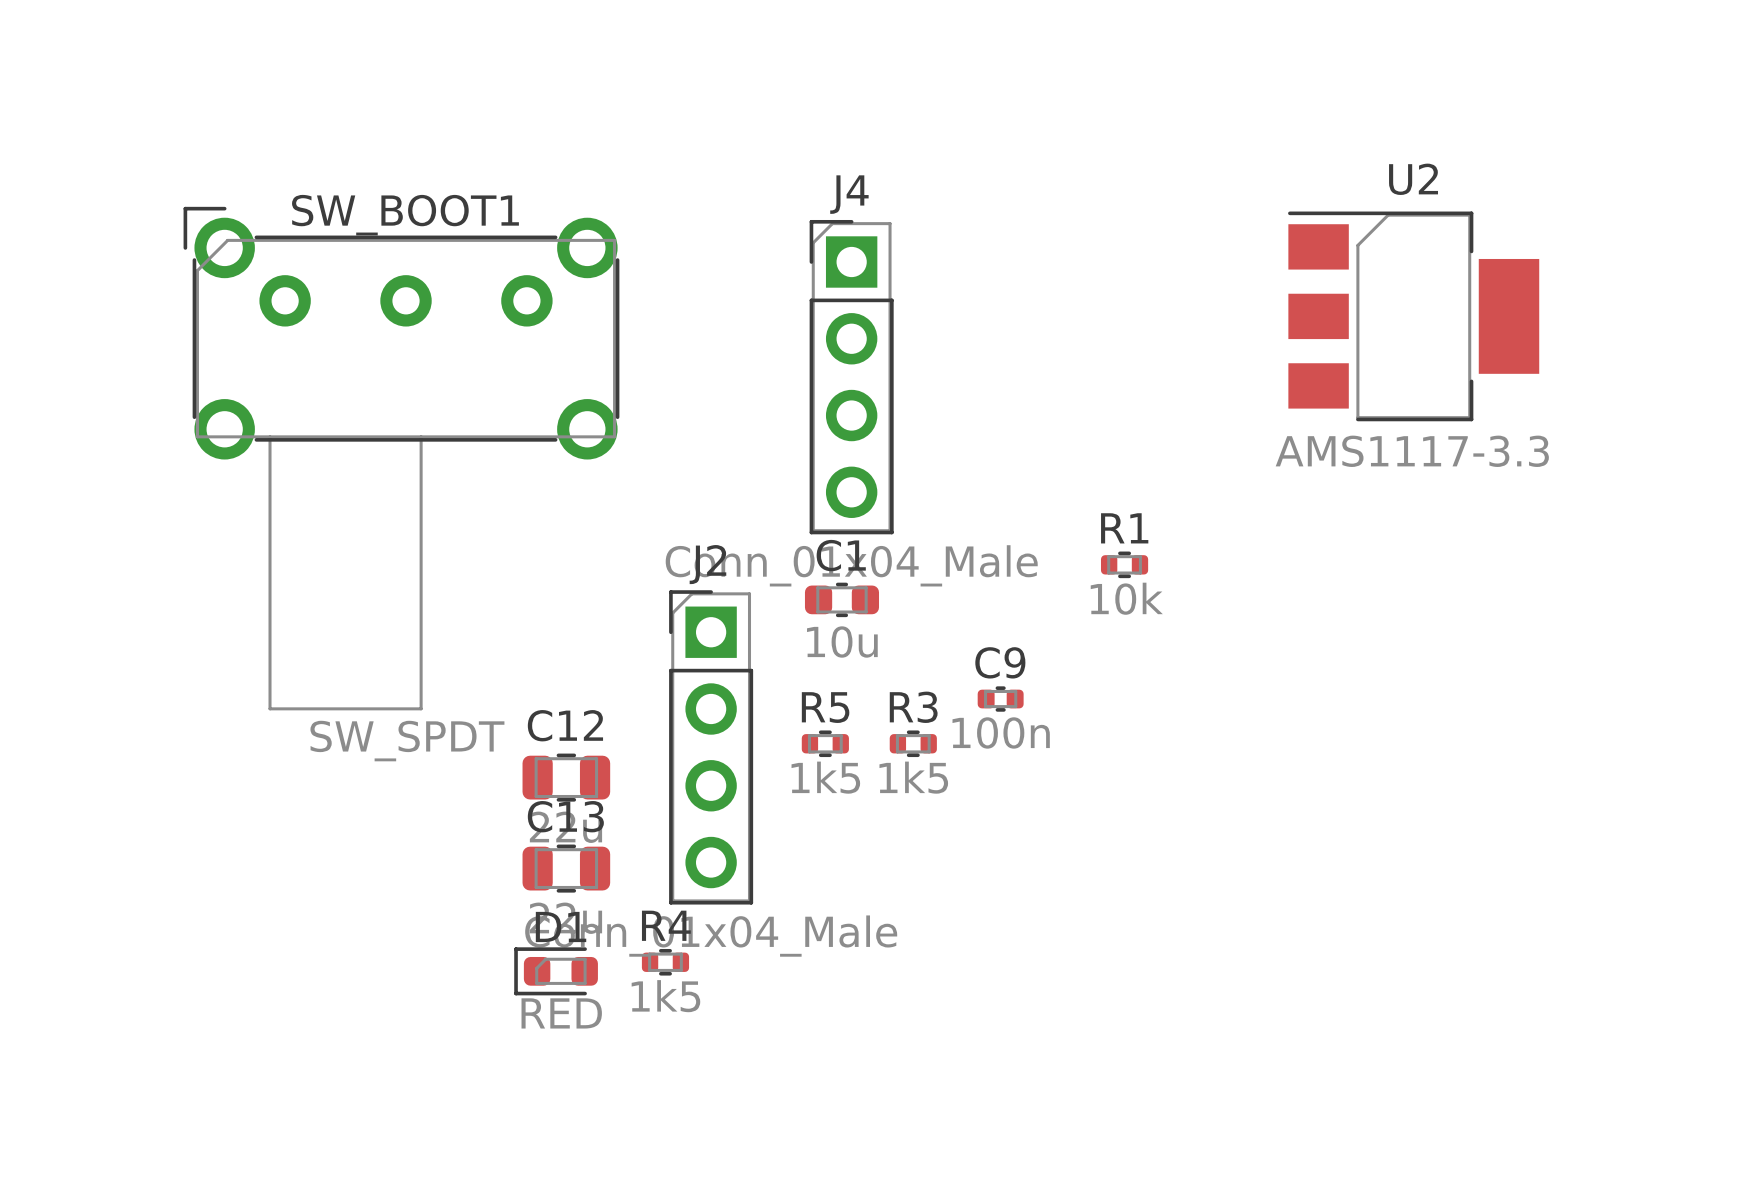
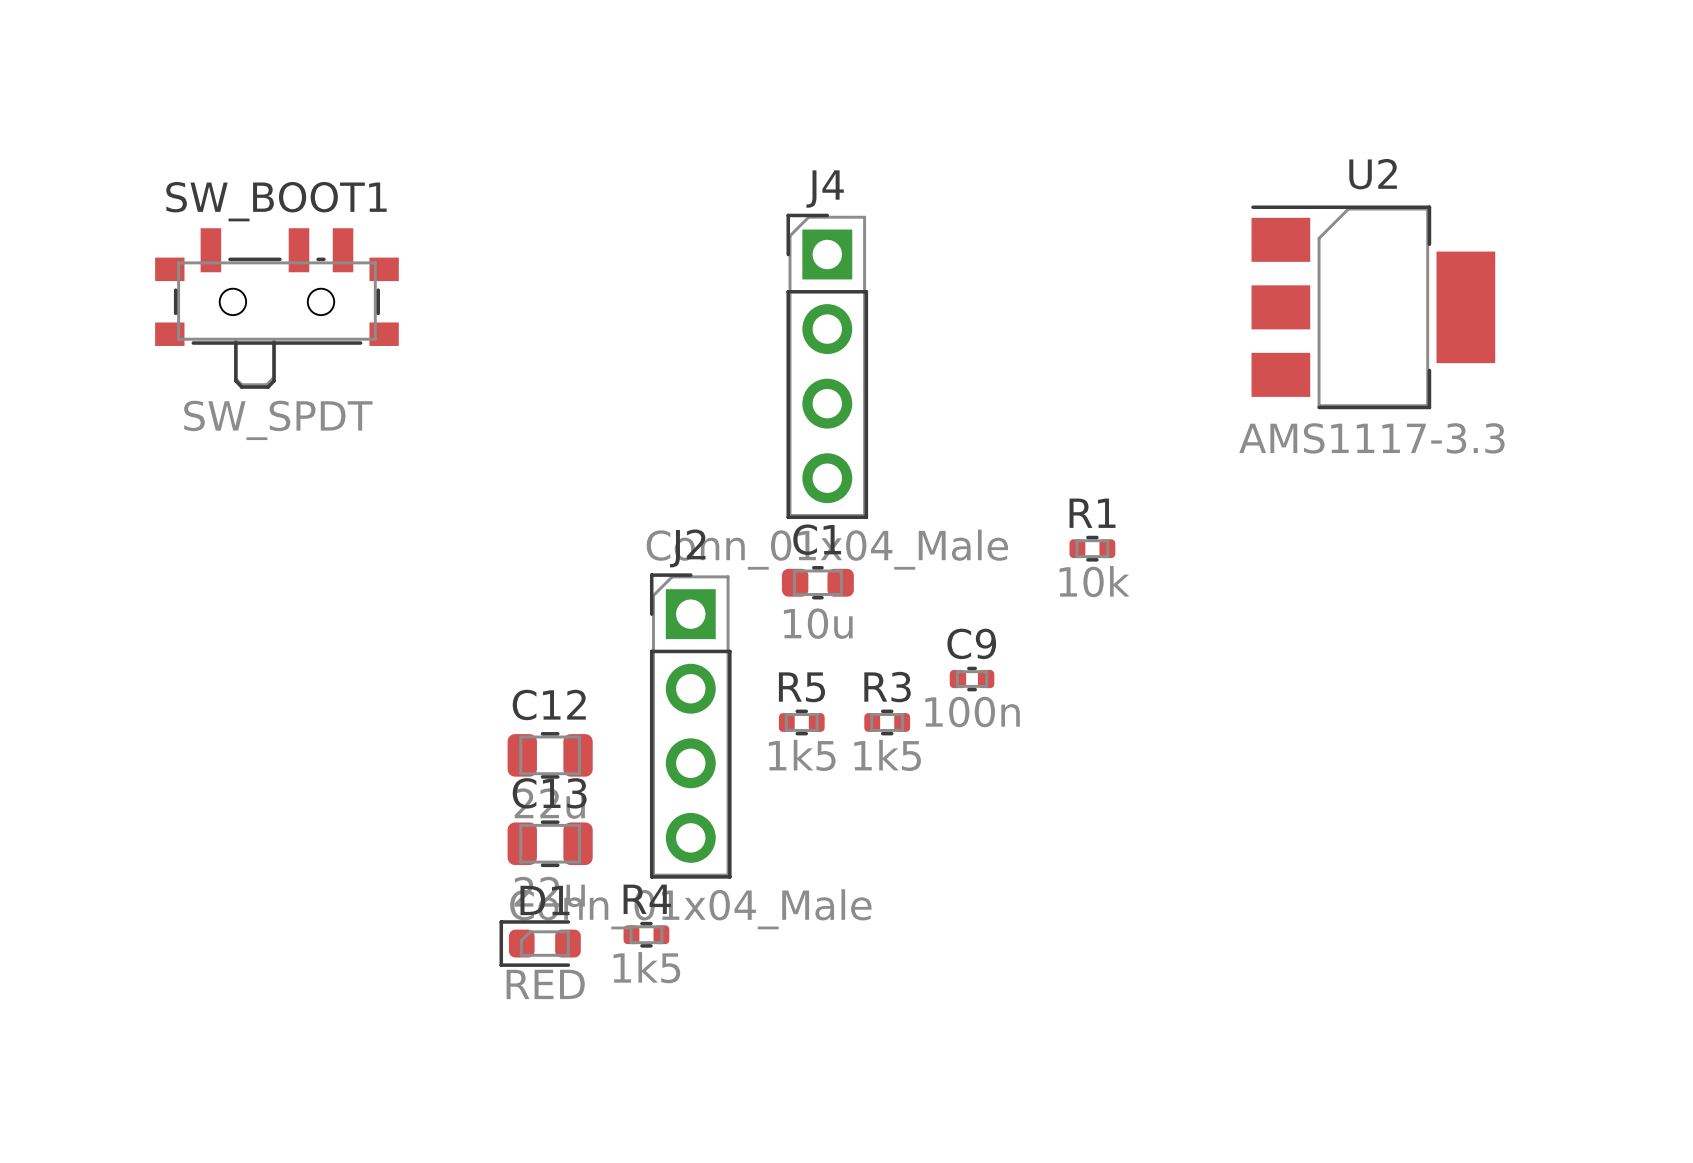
SW_BOOT1 footprint: [183, 206, 620, 711] -> [155, 228, 399, 389]
SW_BOOT1 name position: SW_BOOT1 (405, 215) -> SW_BOOT1 (276, 201)
SW_BOOT1 value position: SW_SPDT (407, 741) -> SW_SPDT (278, 420)

